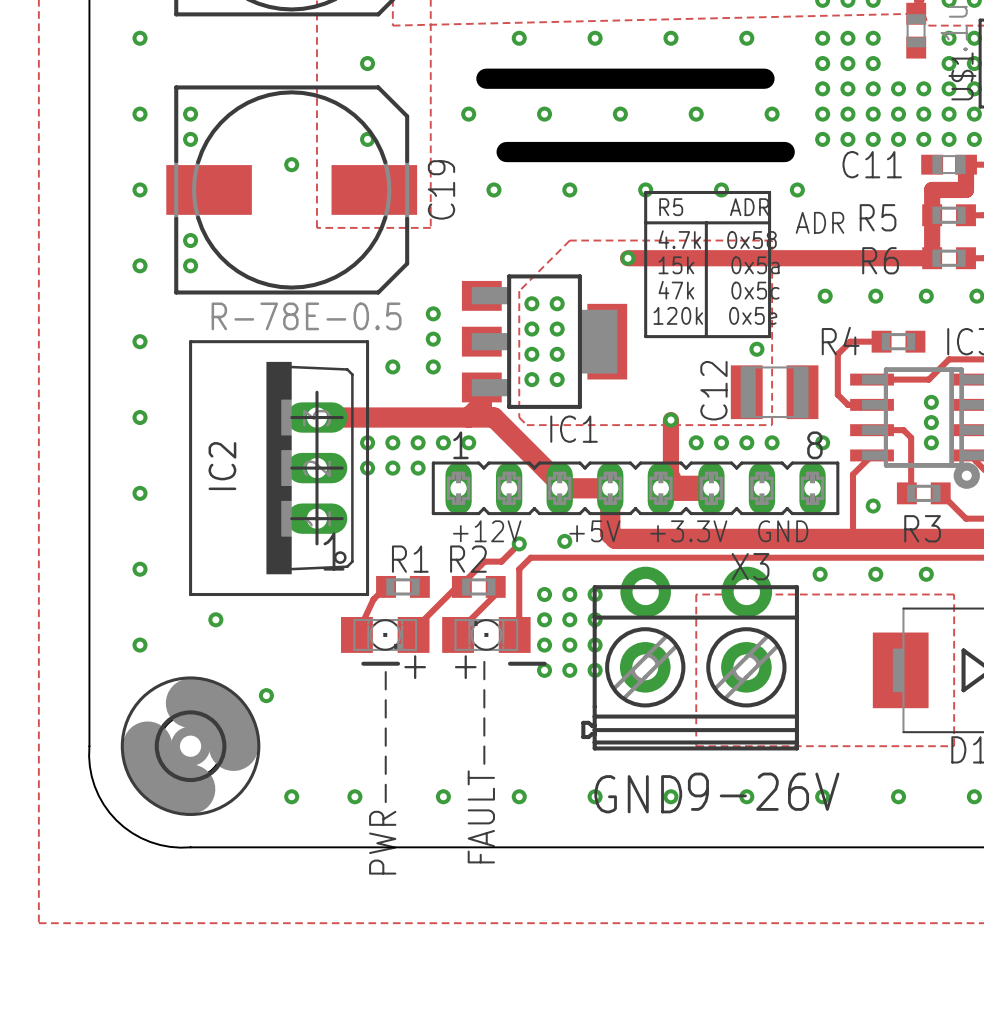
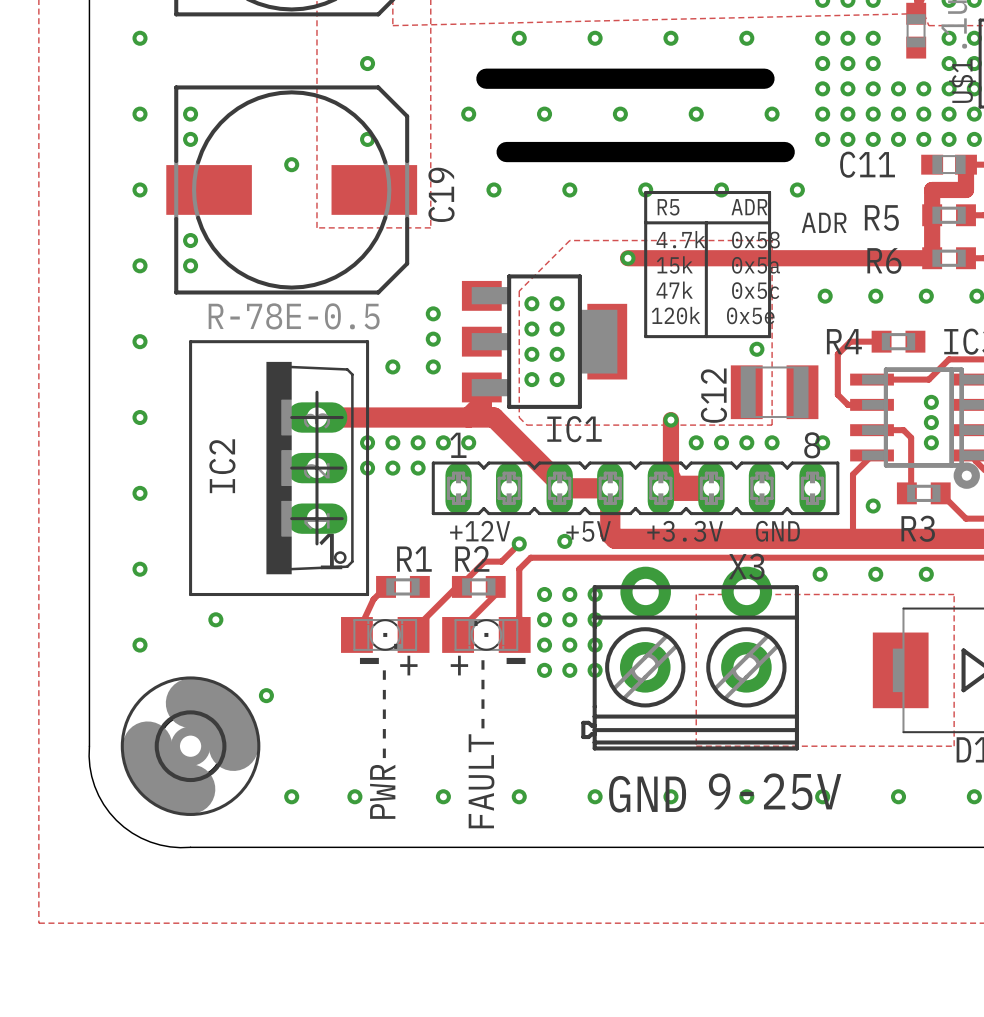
text: 9-26V (763, 791) -> 9-25V (775, 791)

